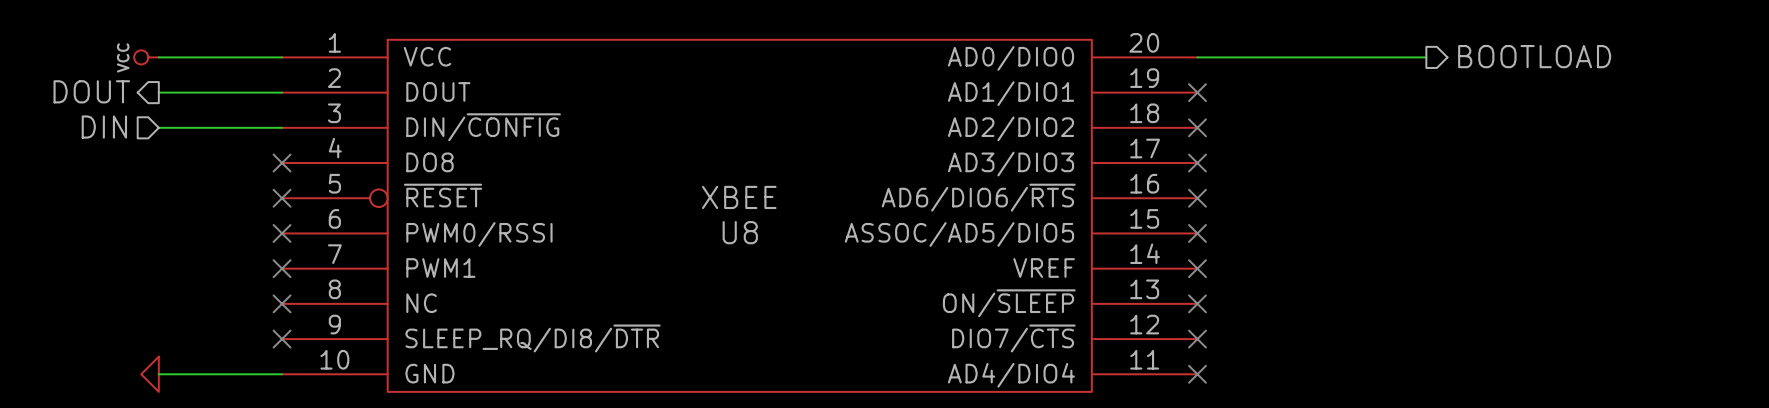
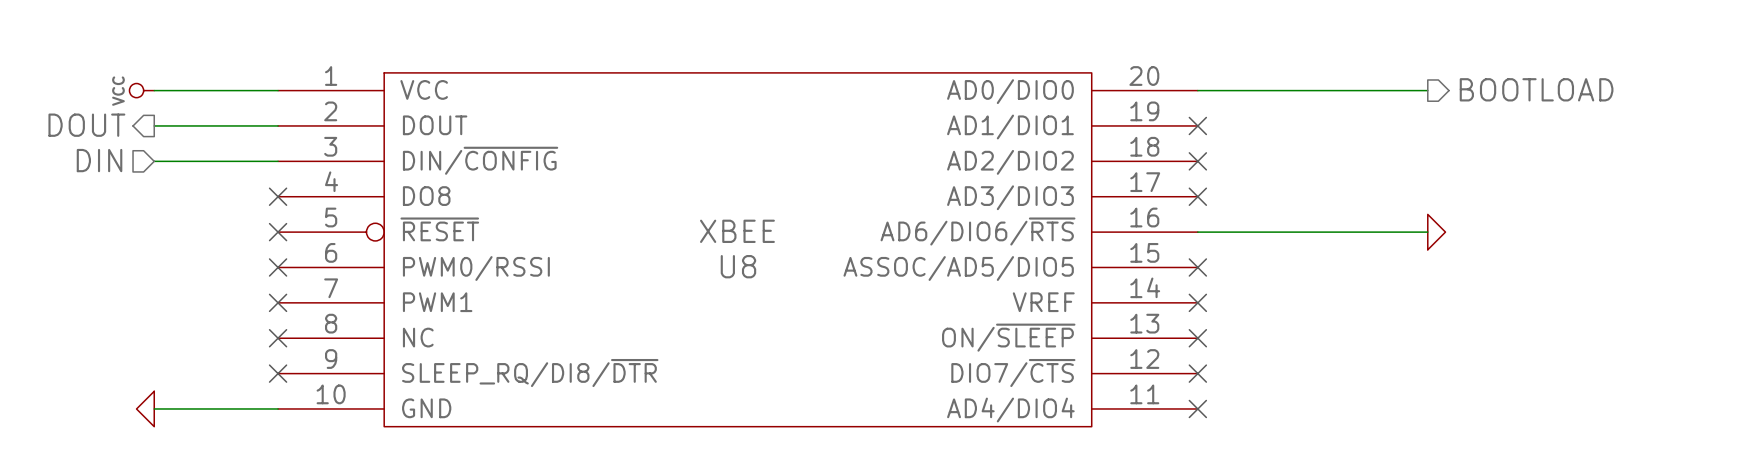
wire: none -> (1197, 232) (1427, 232)
no-connect mark: (1197, 198) -> none
power symbol: none -> (1436, 232)

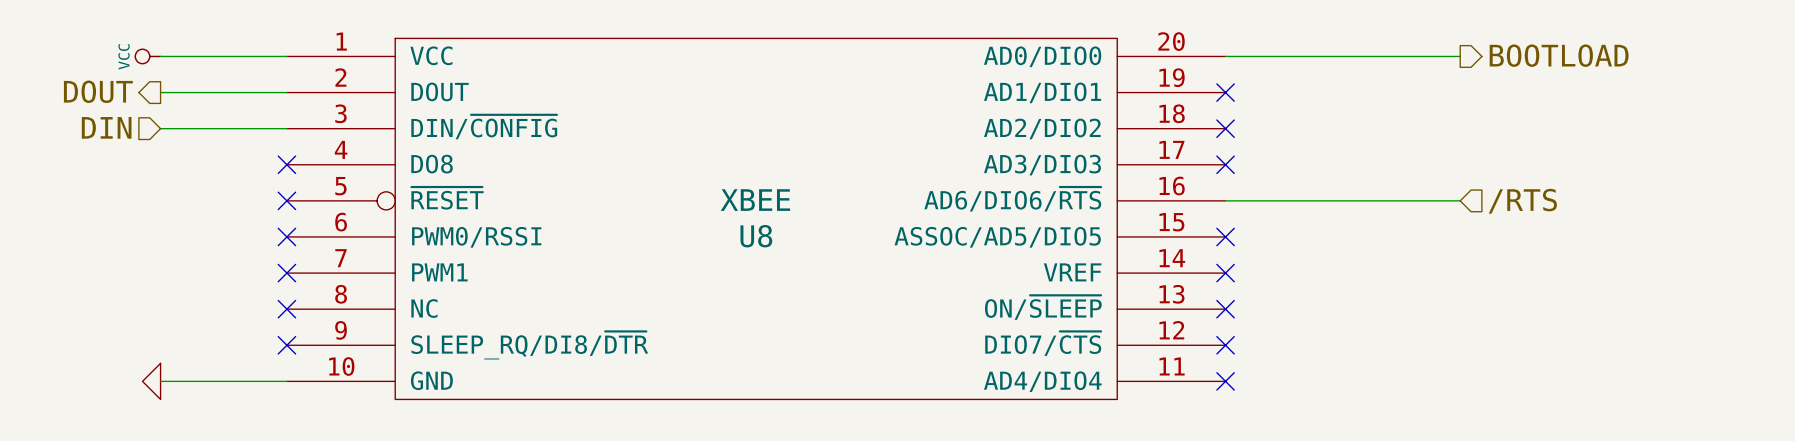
power symbol: (1436, 232) -> none
hierarchical label: none -> /RTS (1522, 201)

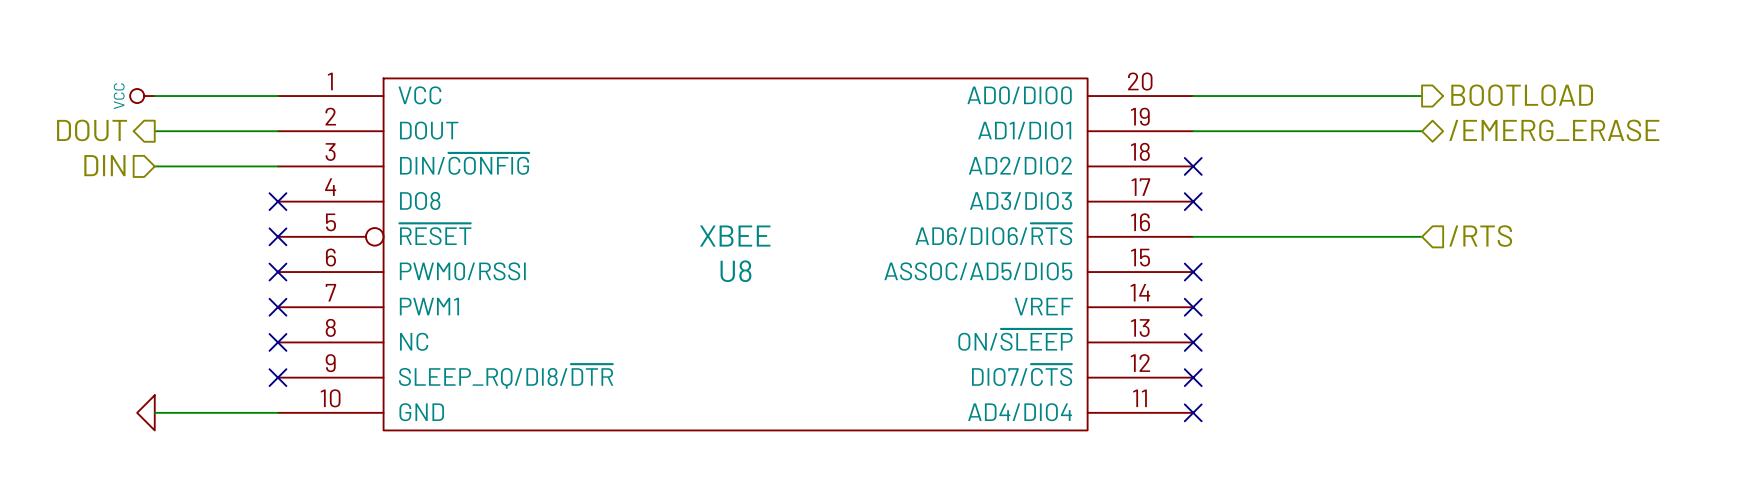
wire: none -> (1193, 131) (1422, 131)
no-connect mark: (1225, 92) -> none
hierarchical label: none -> /EMERG_ERASE (1554, 130)

